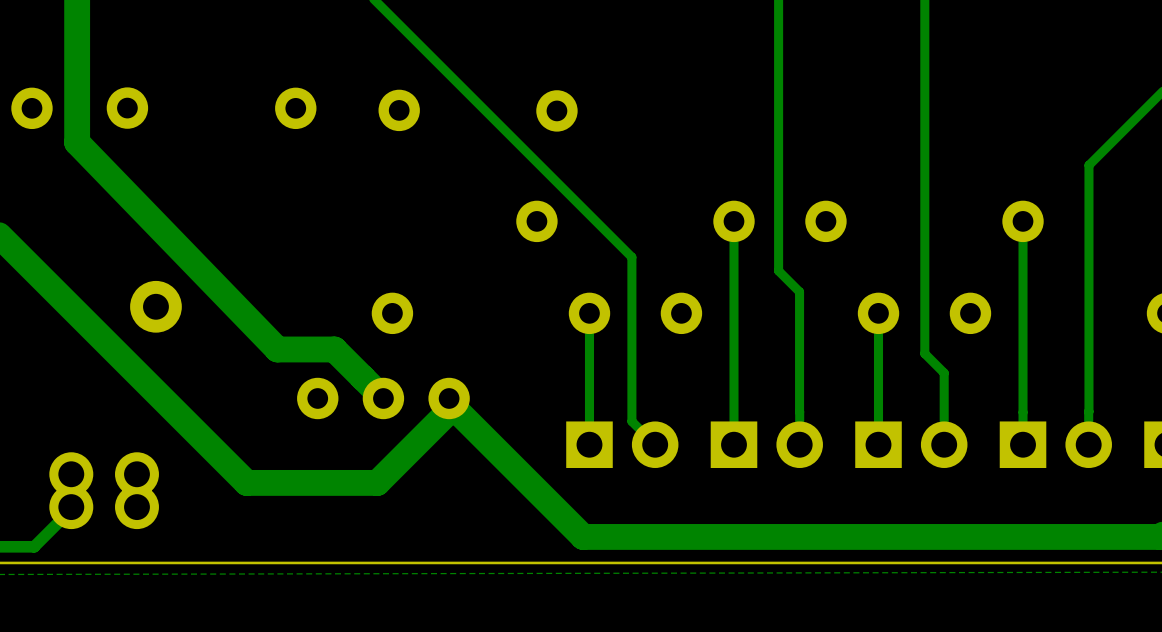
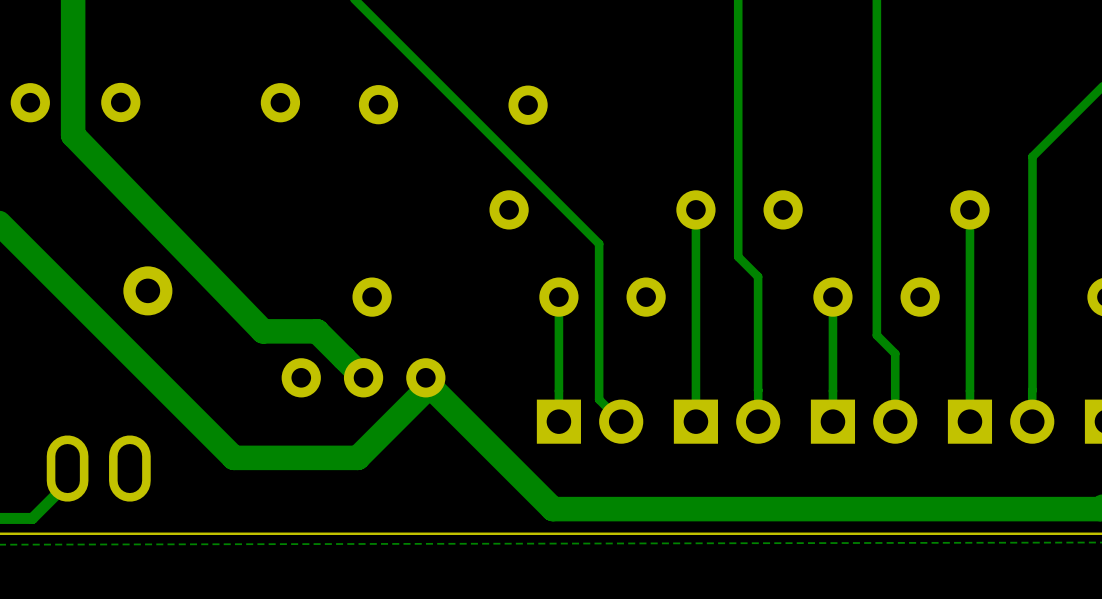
part footprint: [49, 452, 159, 530] -> [46, 435, 151, 502]

